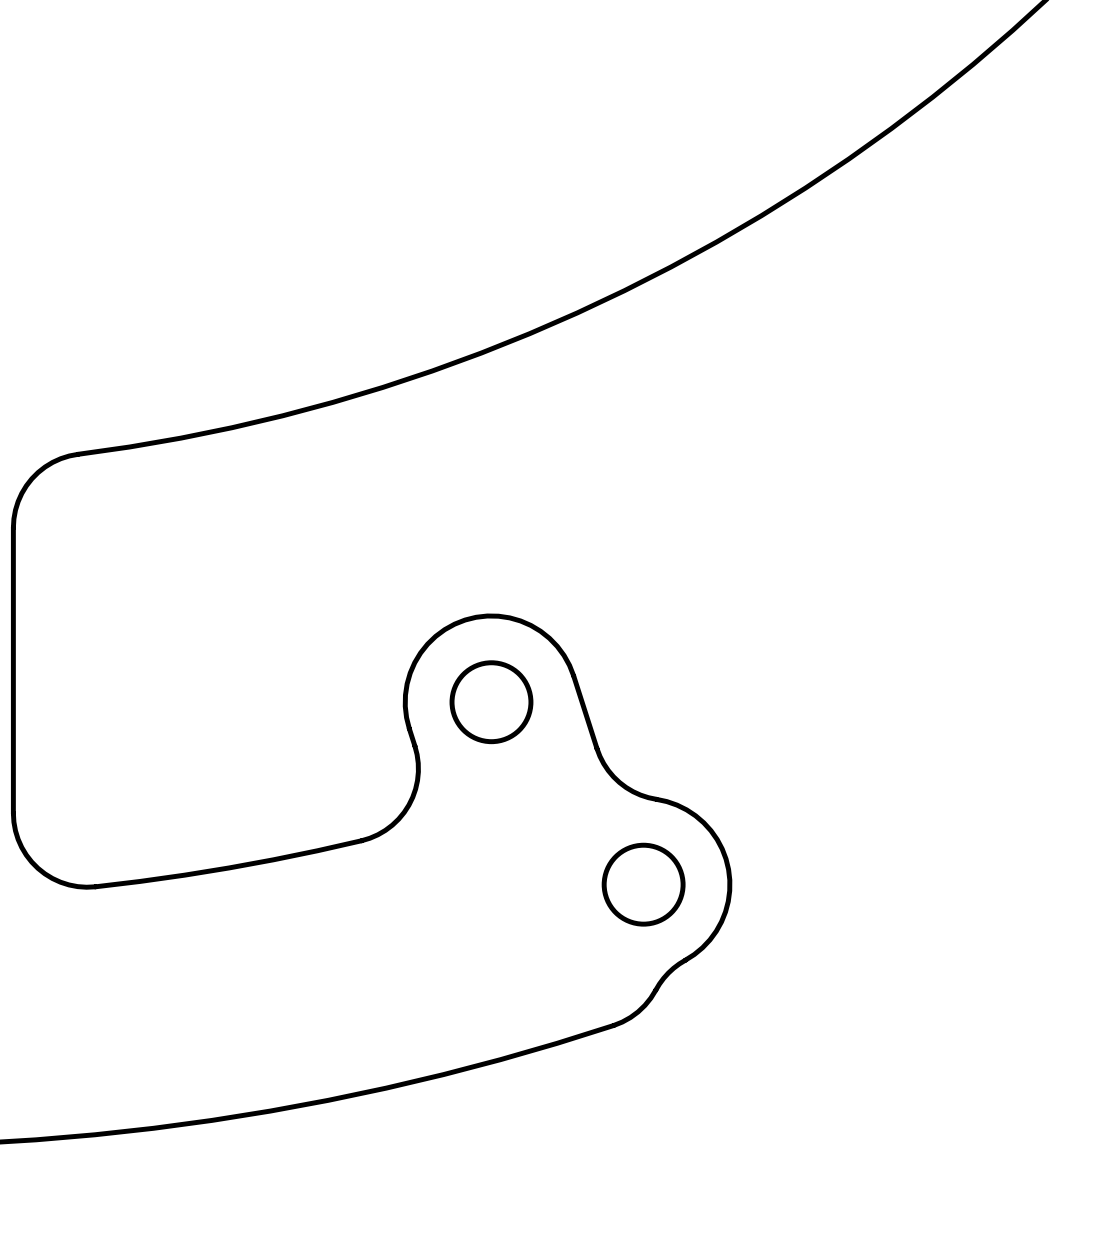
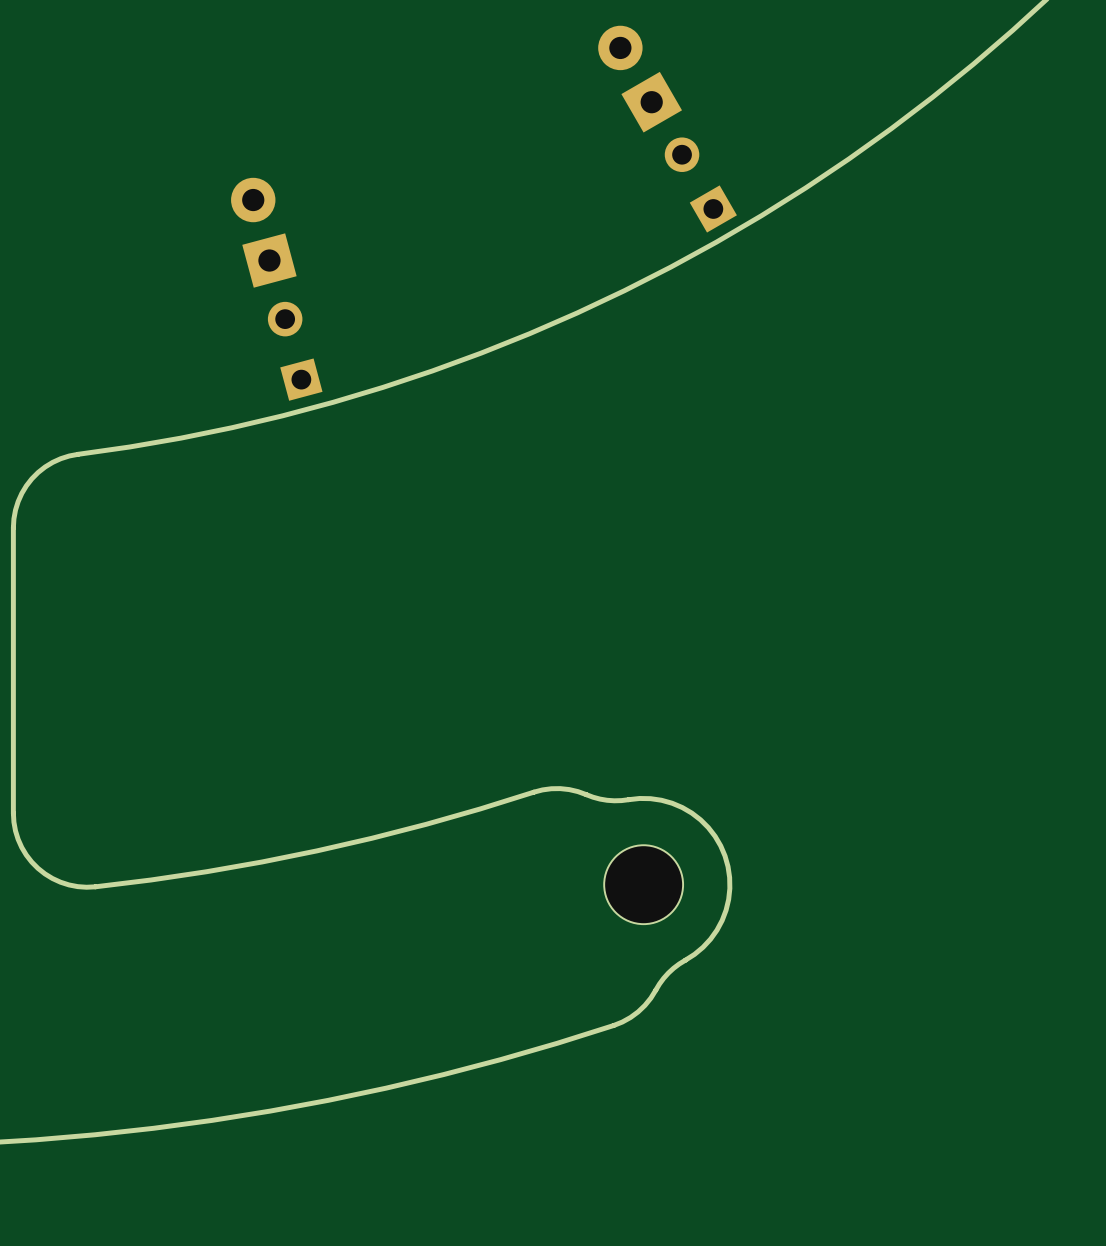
part: none -> (640, 79)
part: none -> (700, 185)
part: none -> (263, 232)
part: none -> (295, 351)
round board edge: [449, 660, 534, 745] -> none
round board edge: [601, 842, 686, 927] -> none
part: none -> (643, 884)
board edge: (95, 886) (184, 875) (273, 859) (361, 840) (385, 830) (398, 819) (408, 805) (417, 780) (417, 754) (405, 706) (407, 683) (414, 662) (435, 636) (454, 624) (476, 617) (498, 616) (520, 620) (540, 631) (564, 655) (573, 675) (599, 756) (613, 776) (626, 787) (640, 795) (666, 801) (686, 809) (703, 822) (717, 839) (726, 859) (729, 880) (725, 911) (710, 939) (685, 960) -> (95, 886) (206, 871) (317, 850) (426, 824) (542, 789) (569, 789) (607, 800) (650, 798) (682, 807) (700, 819) (715, 836) (728, 866) (729, 888) (722, 920) (703, 947) (685, 960)

